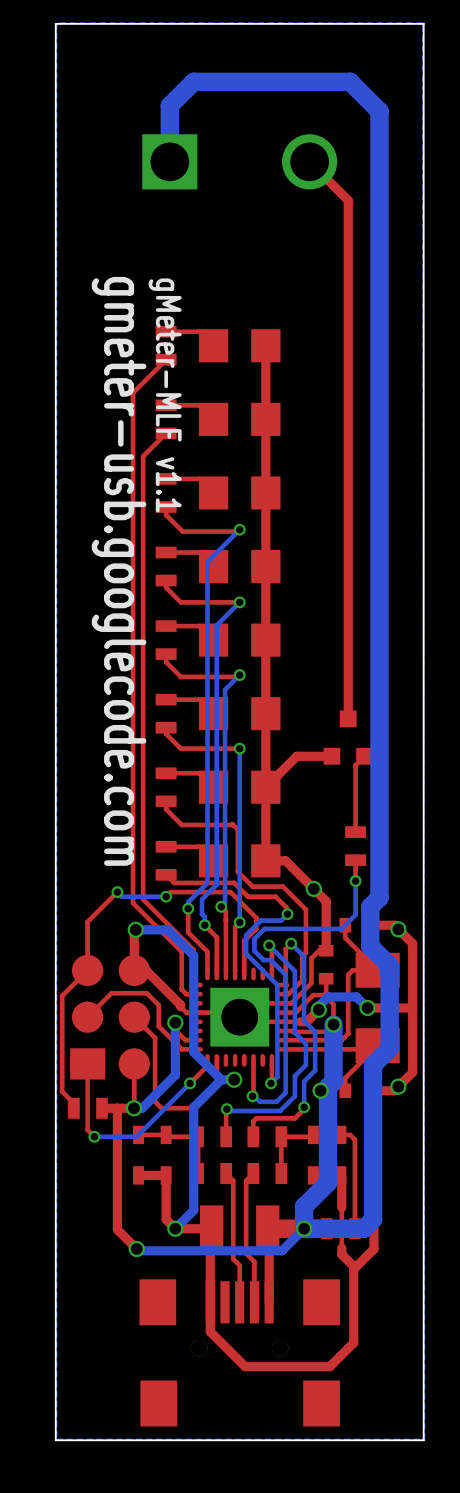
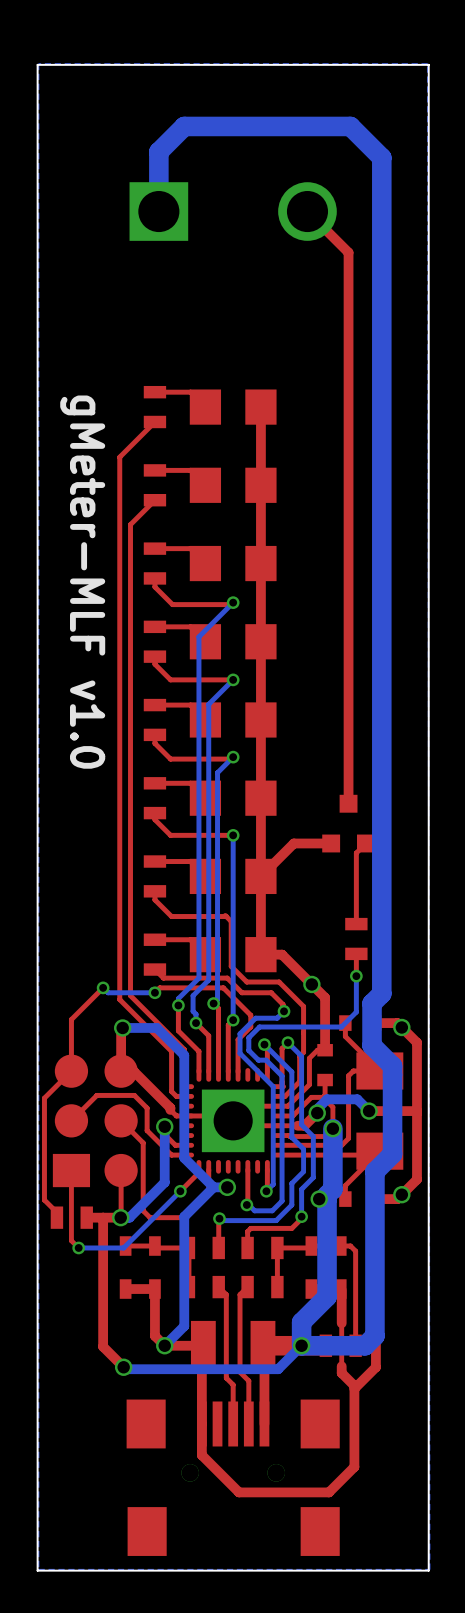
text: gMeter-MLF v1.1 (165, 395) -> none
text: none -> gMeter-MLF v1.0 (82, 582)
text: gmeter-usb.googlecode.com (119, 571) -> none

